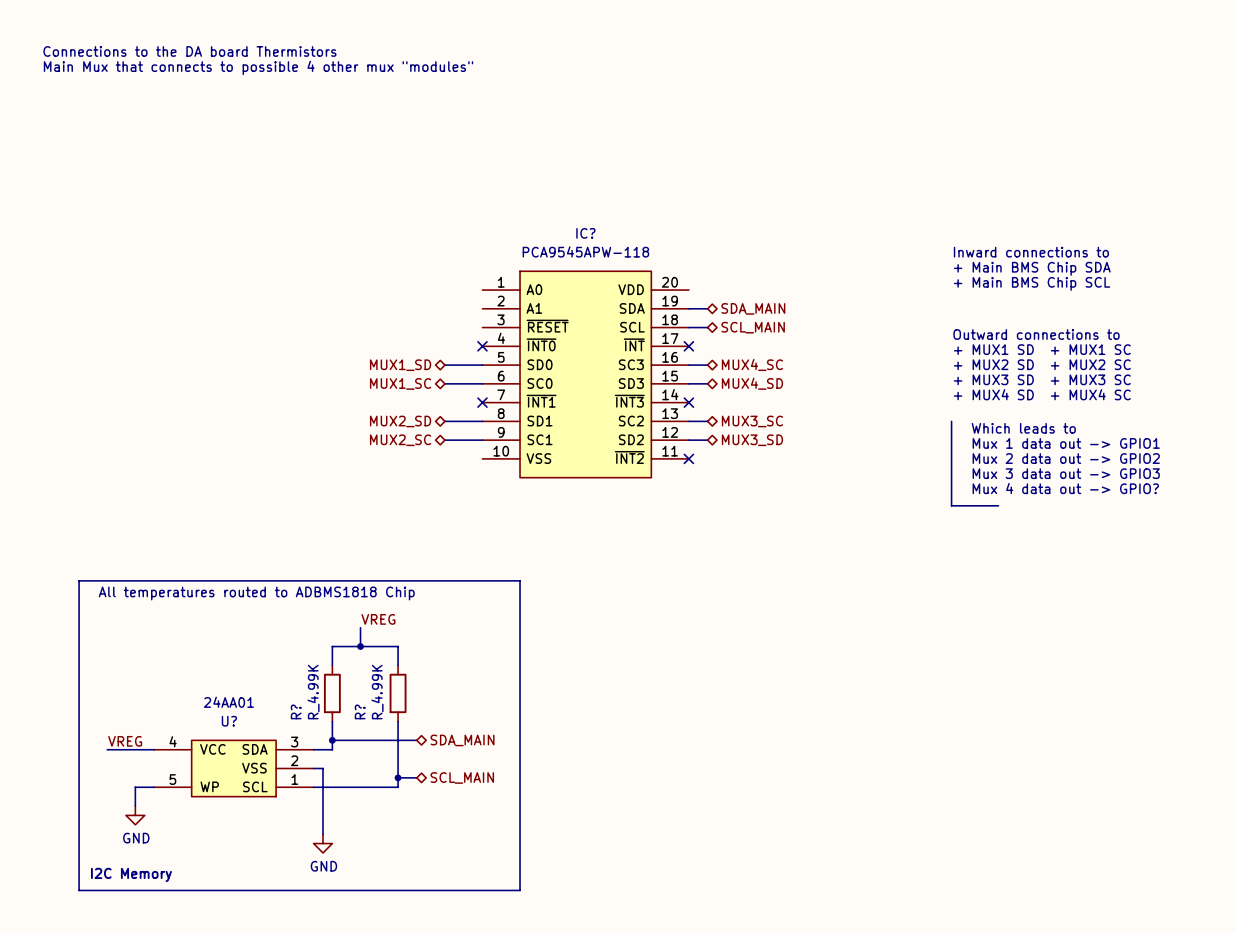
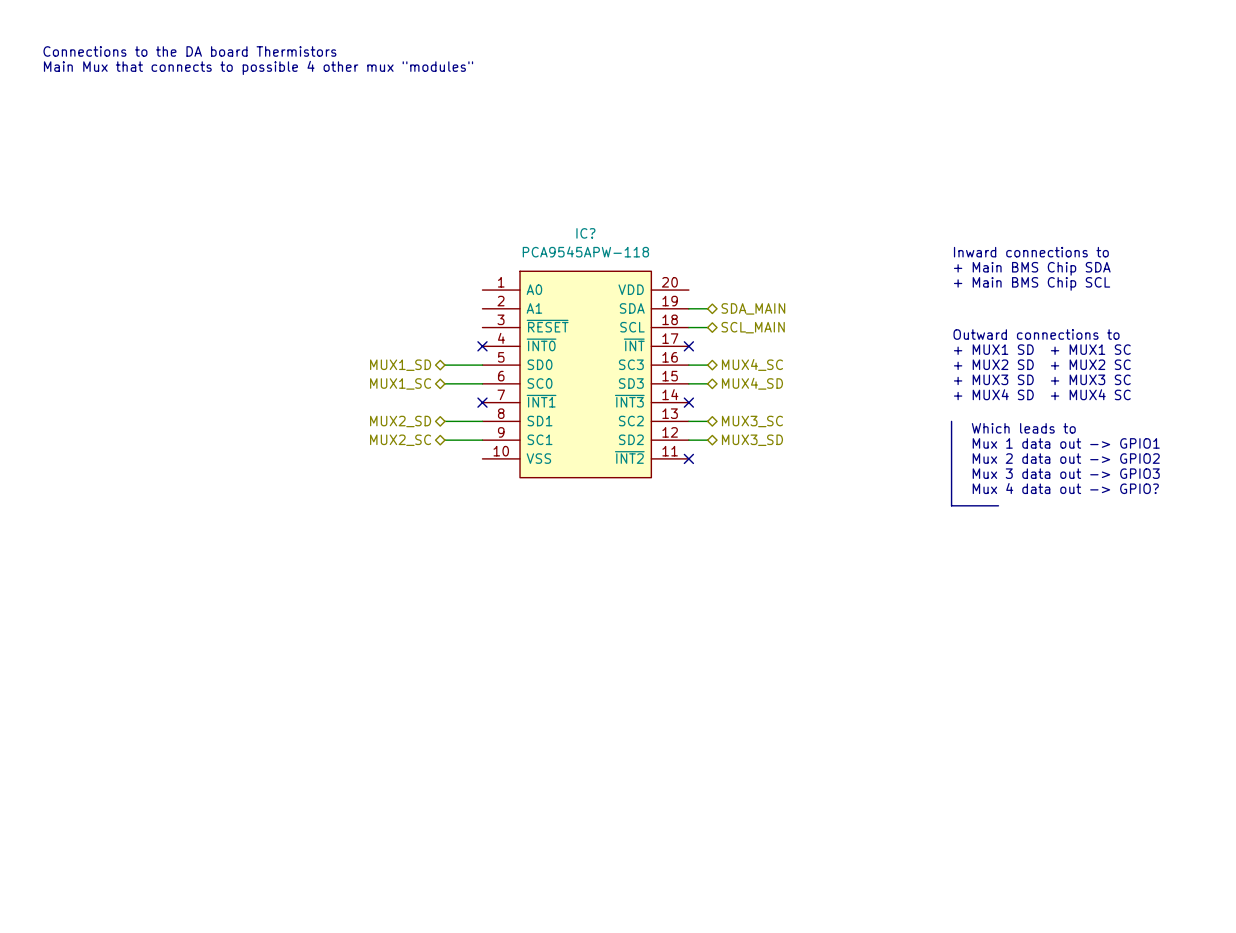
line: (79, 580) (79, 890) (520, 890) (520, 580) (79, 580) -> none
text: All temperatures routed to ADBMS1818 Chip (256, 593) -> none
label: VREG (378, 619) -> none
wire: (360, 627) (360, 646) -> none
junction: (360, 646) -> none
wire: (332, 665) (332, 646) (398, 646) (398, 665) -> none
R?: R_4.99K (332, 693) -> none
R?: R_4.99K (398, 693) -> none
wire: (332, 721) (332, 749) (313, 749) -> none
wire: (398, 721) (398, 787) (313, 787) -> none
wire: (332, 740) (416, 740) -> none
junction: (332, 740) -> none
hierarchical label: SDA_MAIN (462, 740) -> none
label: VREG (125, 741) -> none
wire: (107, 749) (154, 749) -> none
U?: 24AA01 (233, 768) -> none
wire: (313, 768) (322, 768) (322, 834) -> none
wire: (398, 777) (416, 777) -> none
junction: (398, 777) -> none
hierarchical label: SCL_MAIN (462, 777) -> none
wire: (154, 787) (135, 787) (135, 806) -> none
power symbol: GND (135, 815) -> none
power symbol: GND (322, 843) -> none
text: I2C Memory (131, 874) -> none

